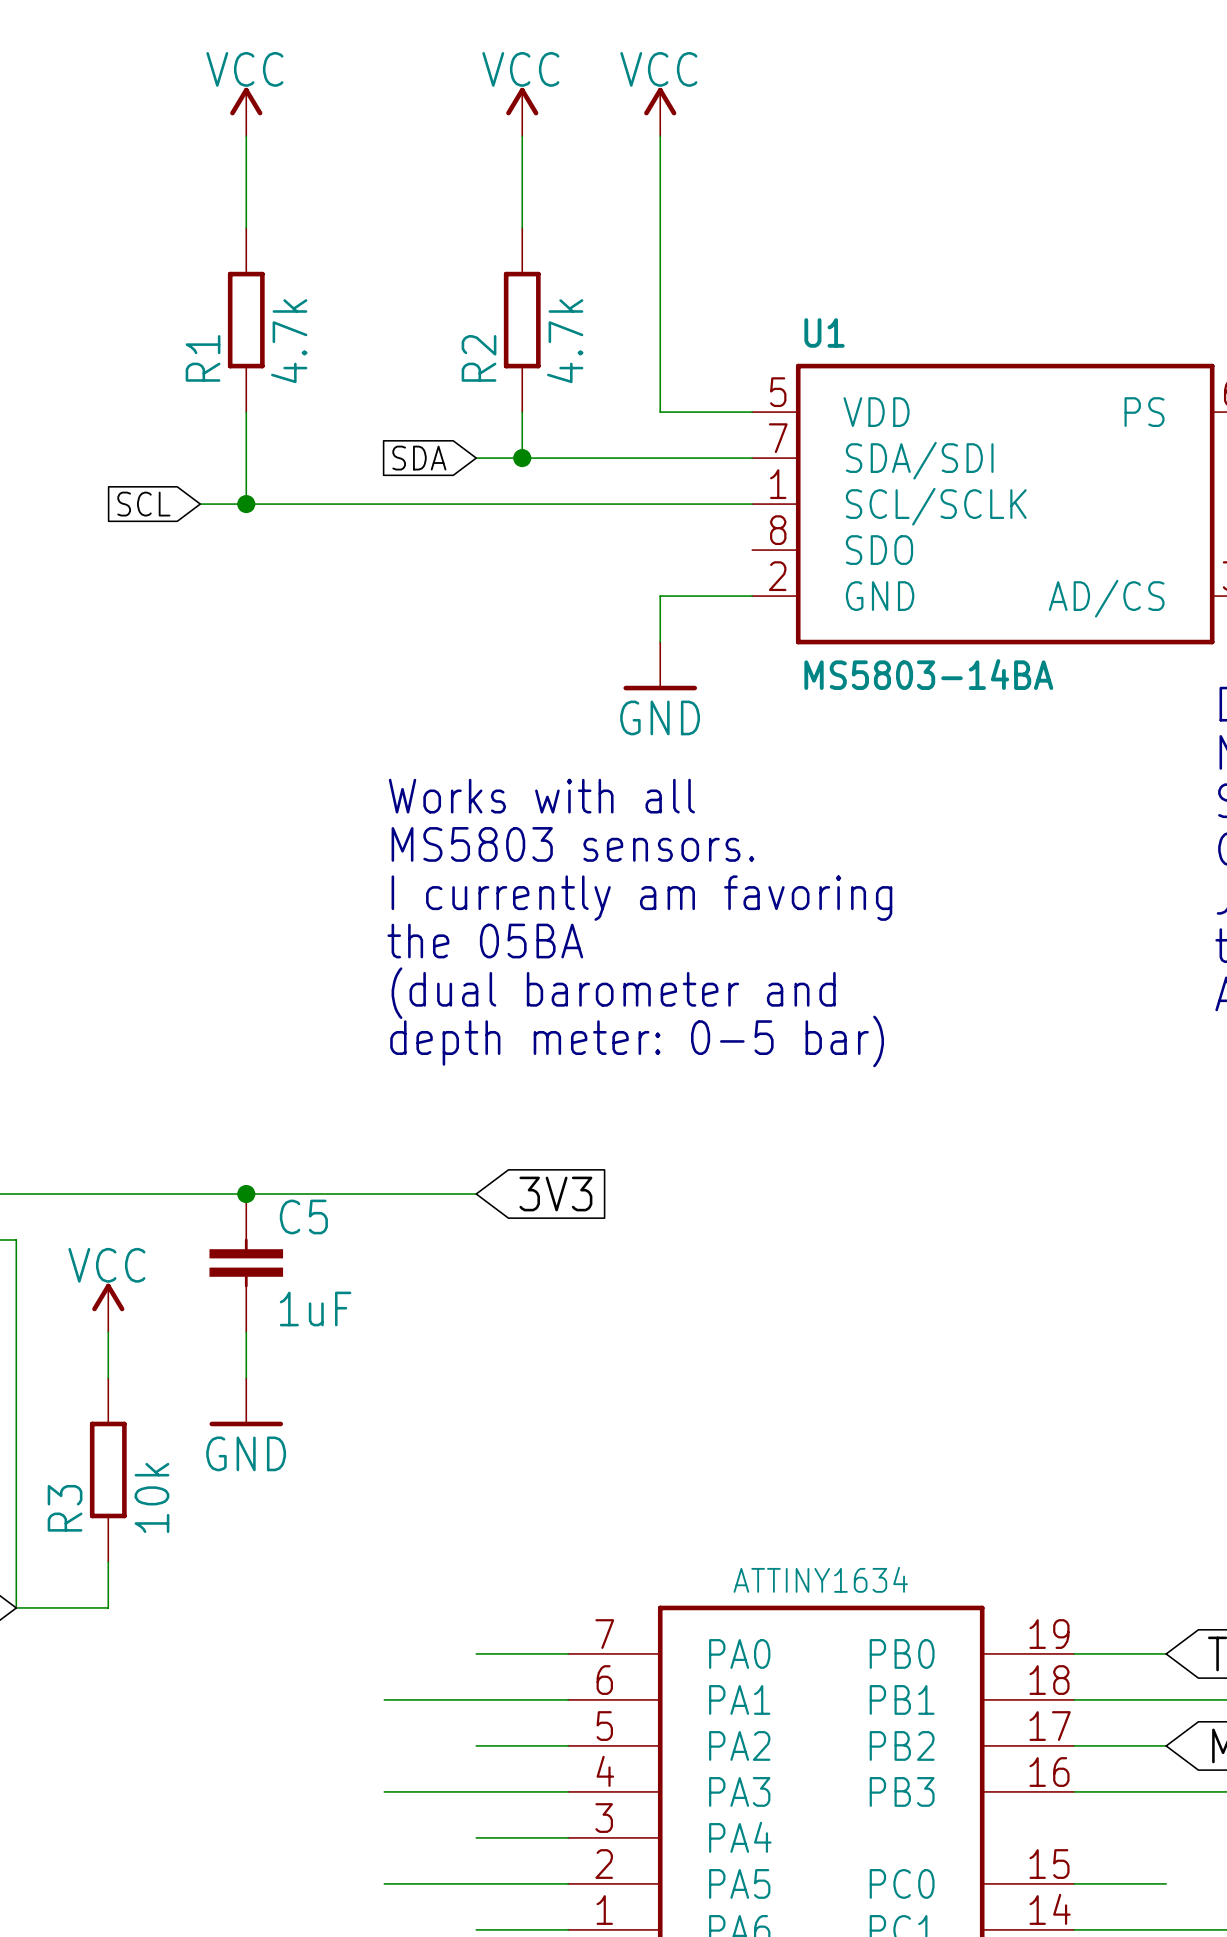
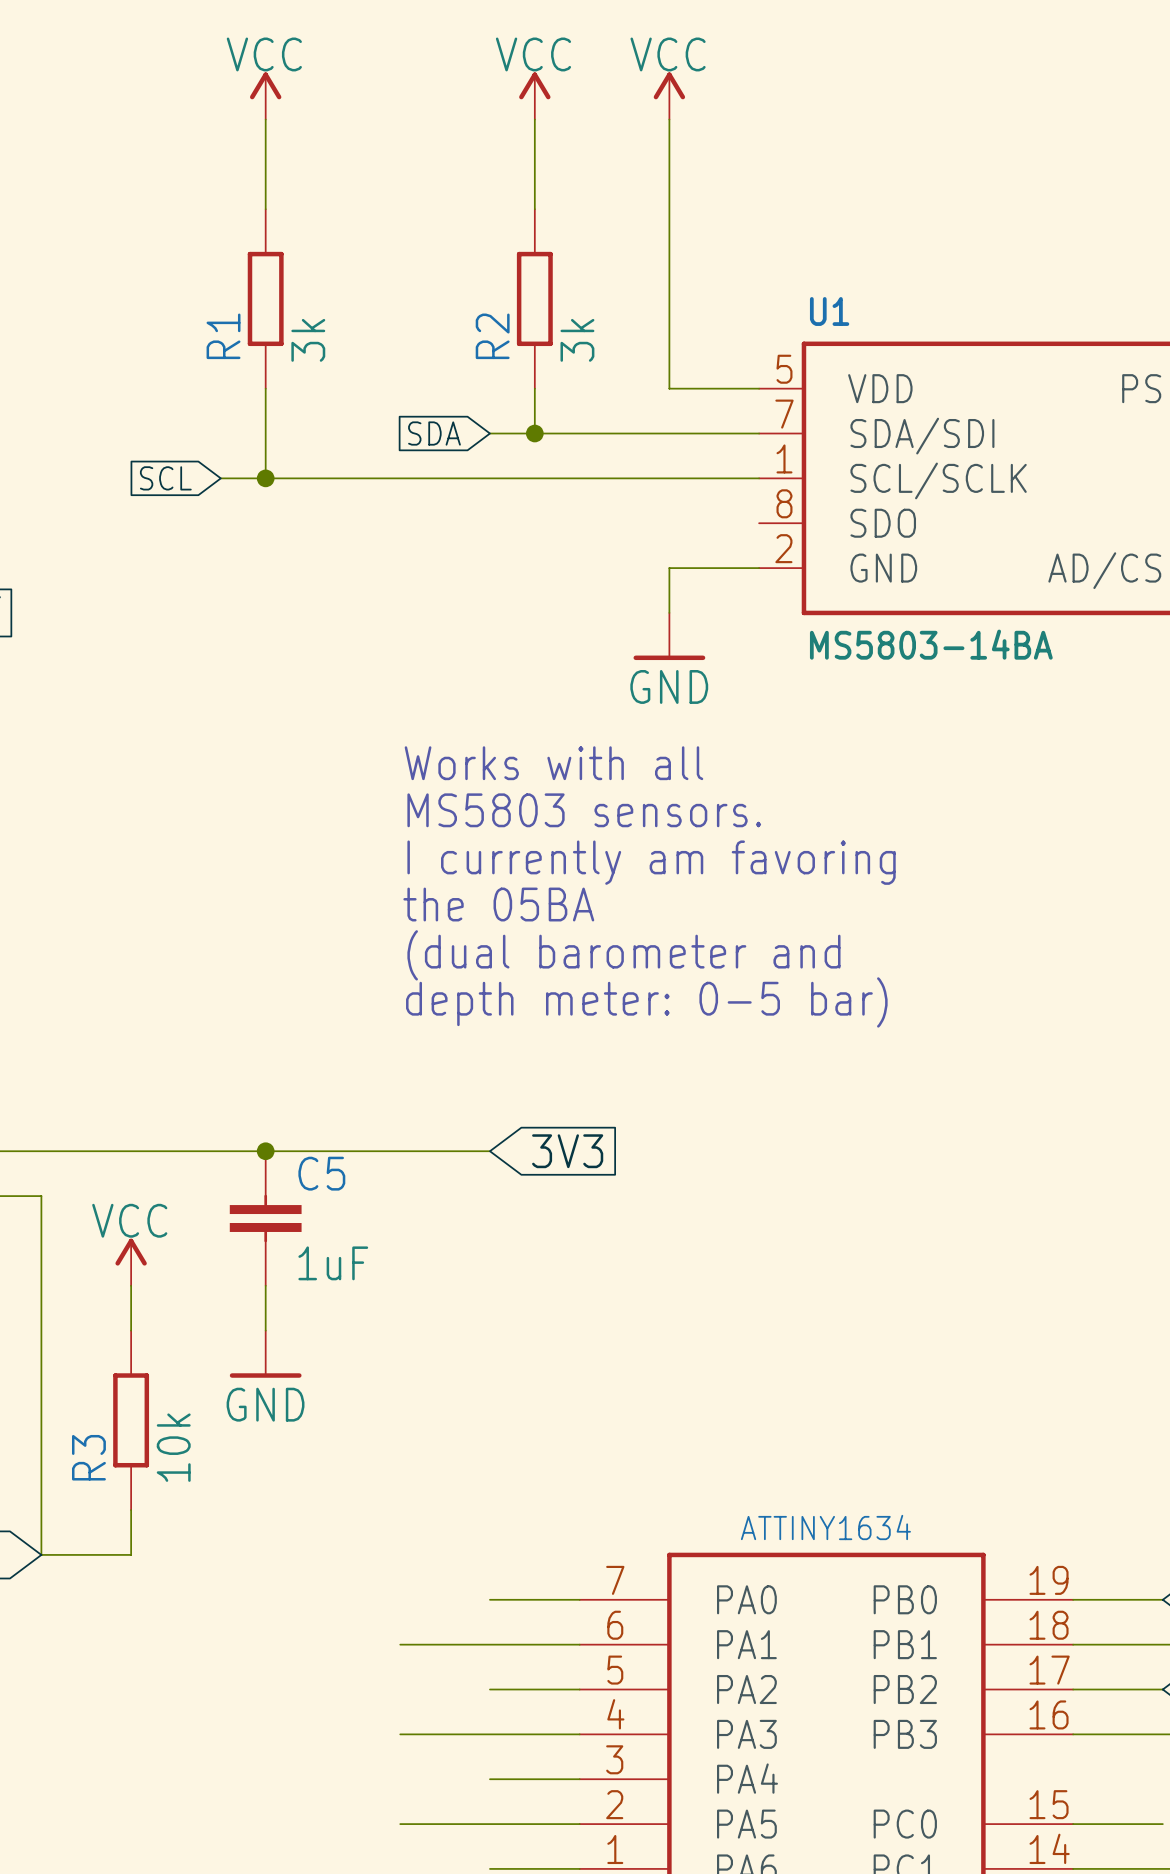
R1 value: 4.7k (289, 341) -> 3k (308, 340)
R2 value: 4.7k (565, 341) -> 3k (577, 340)

